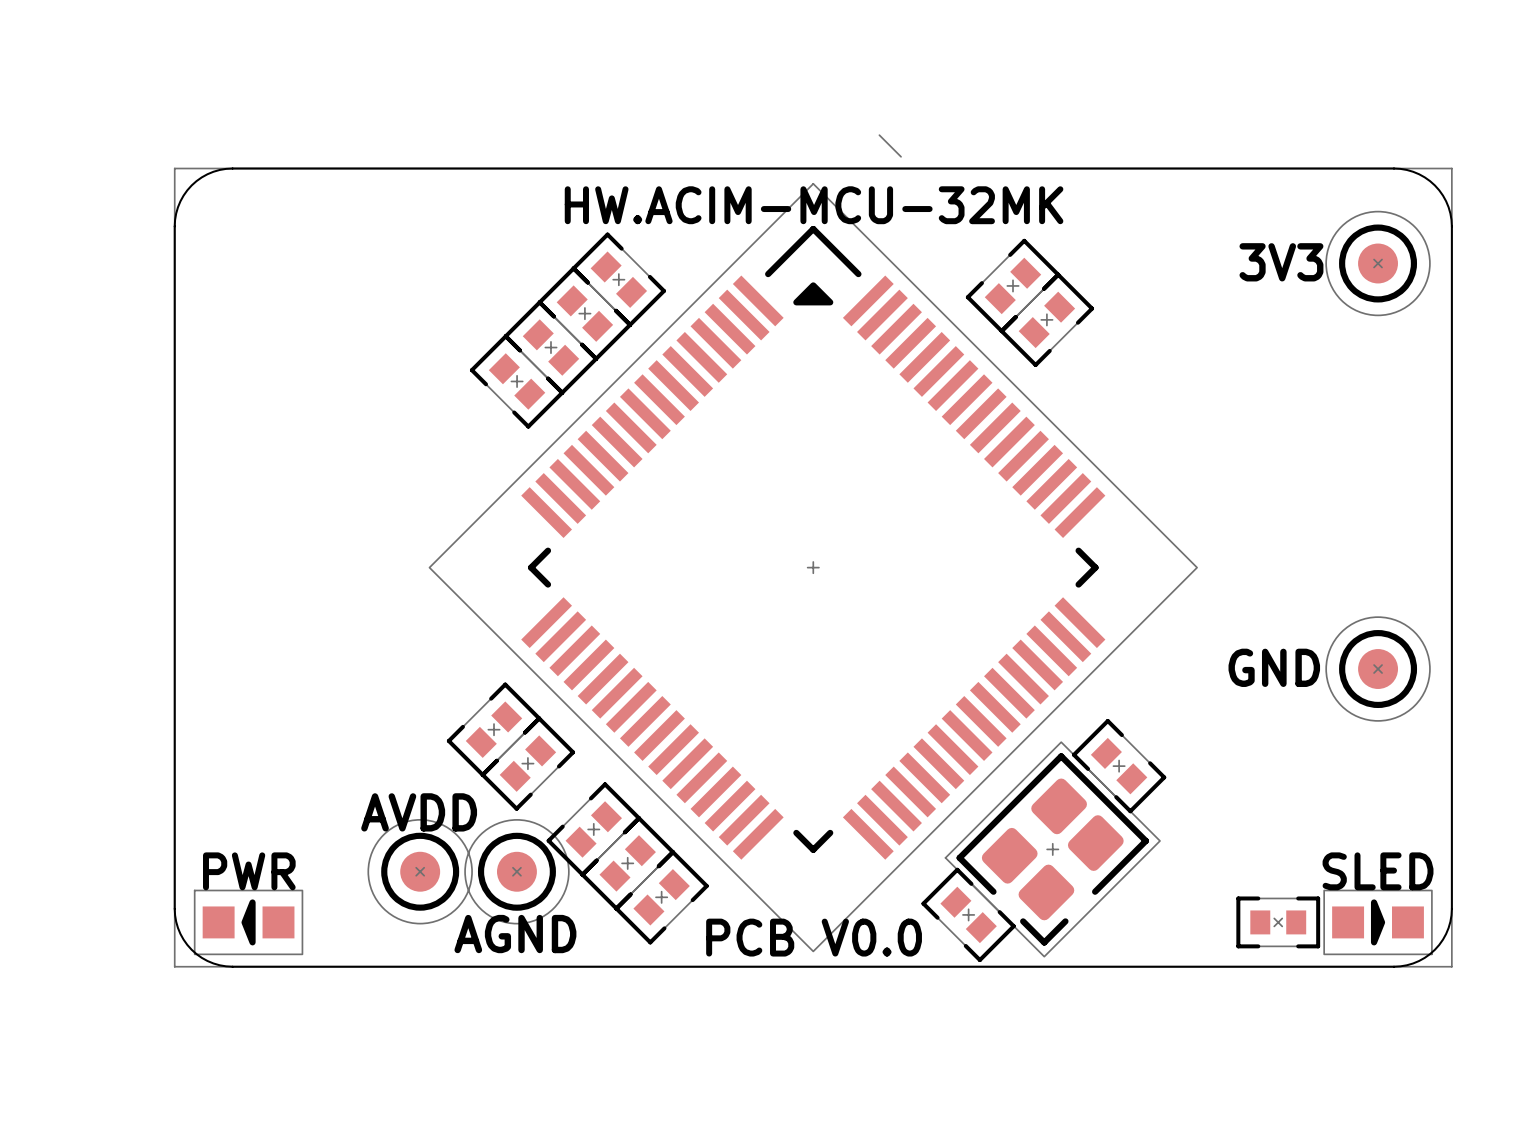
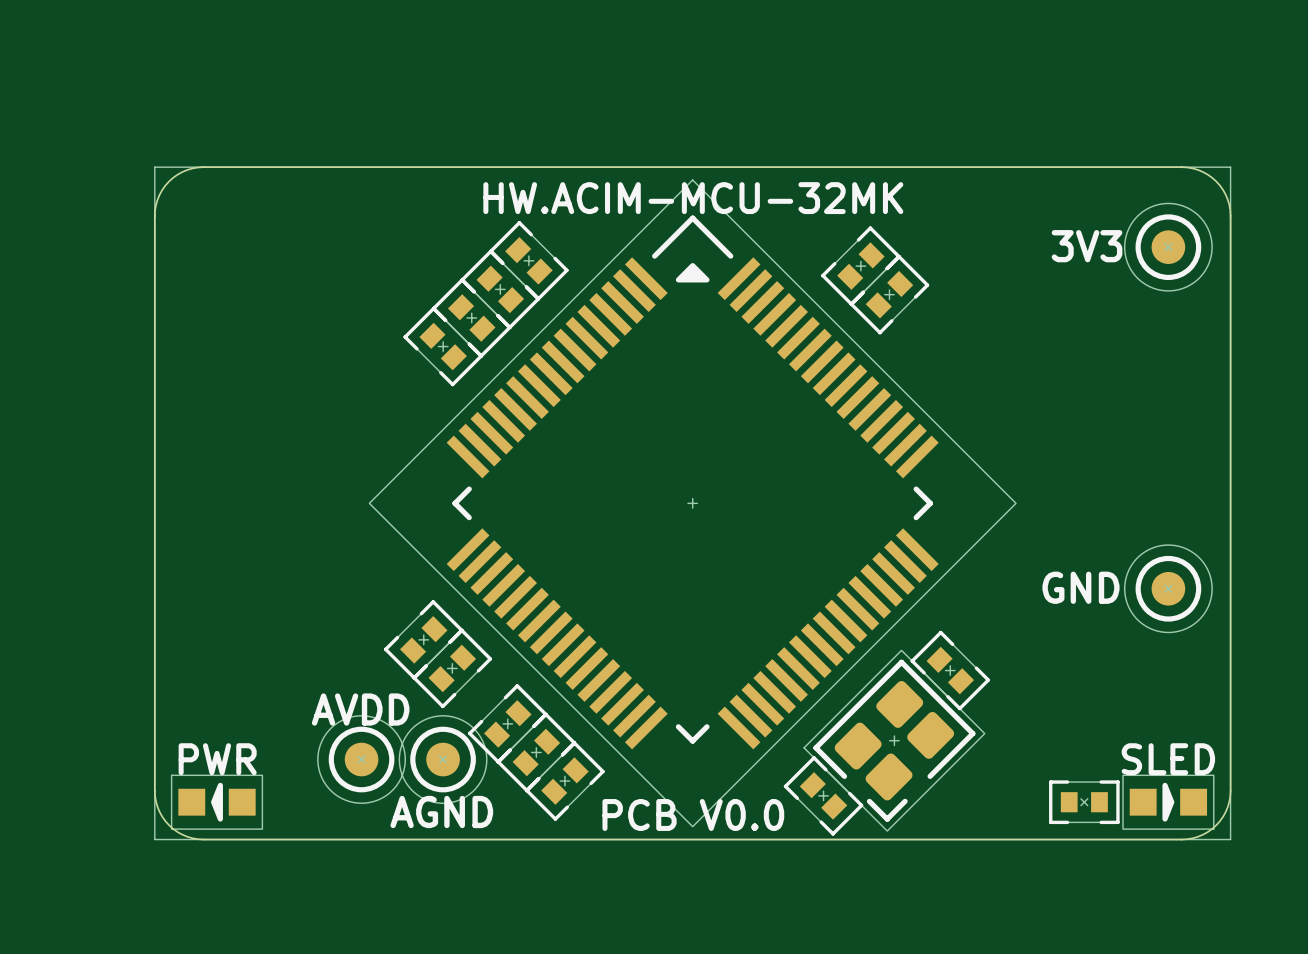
line: (879, 135) (901, 156) -> none

